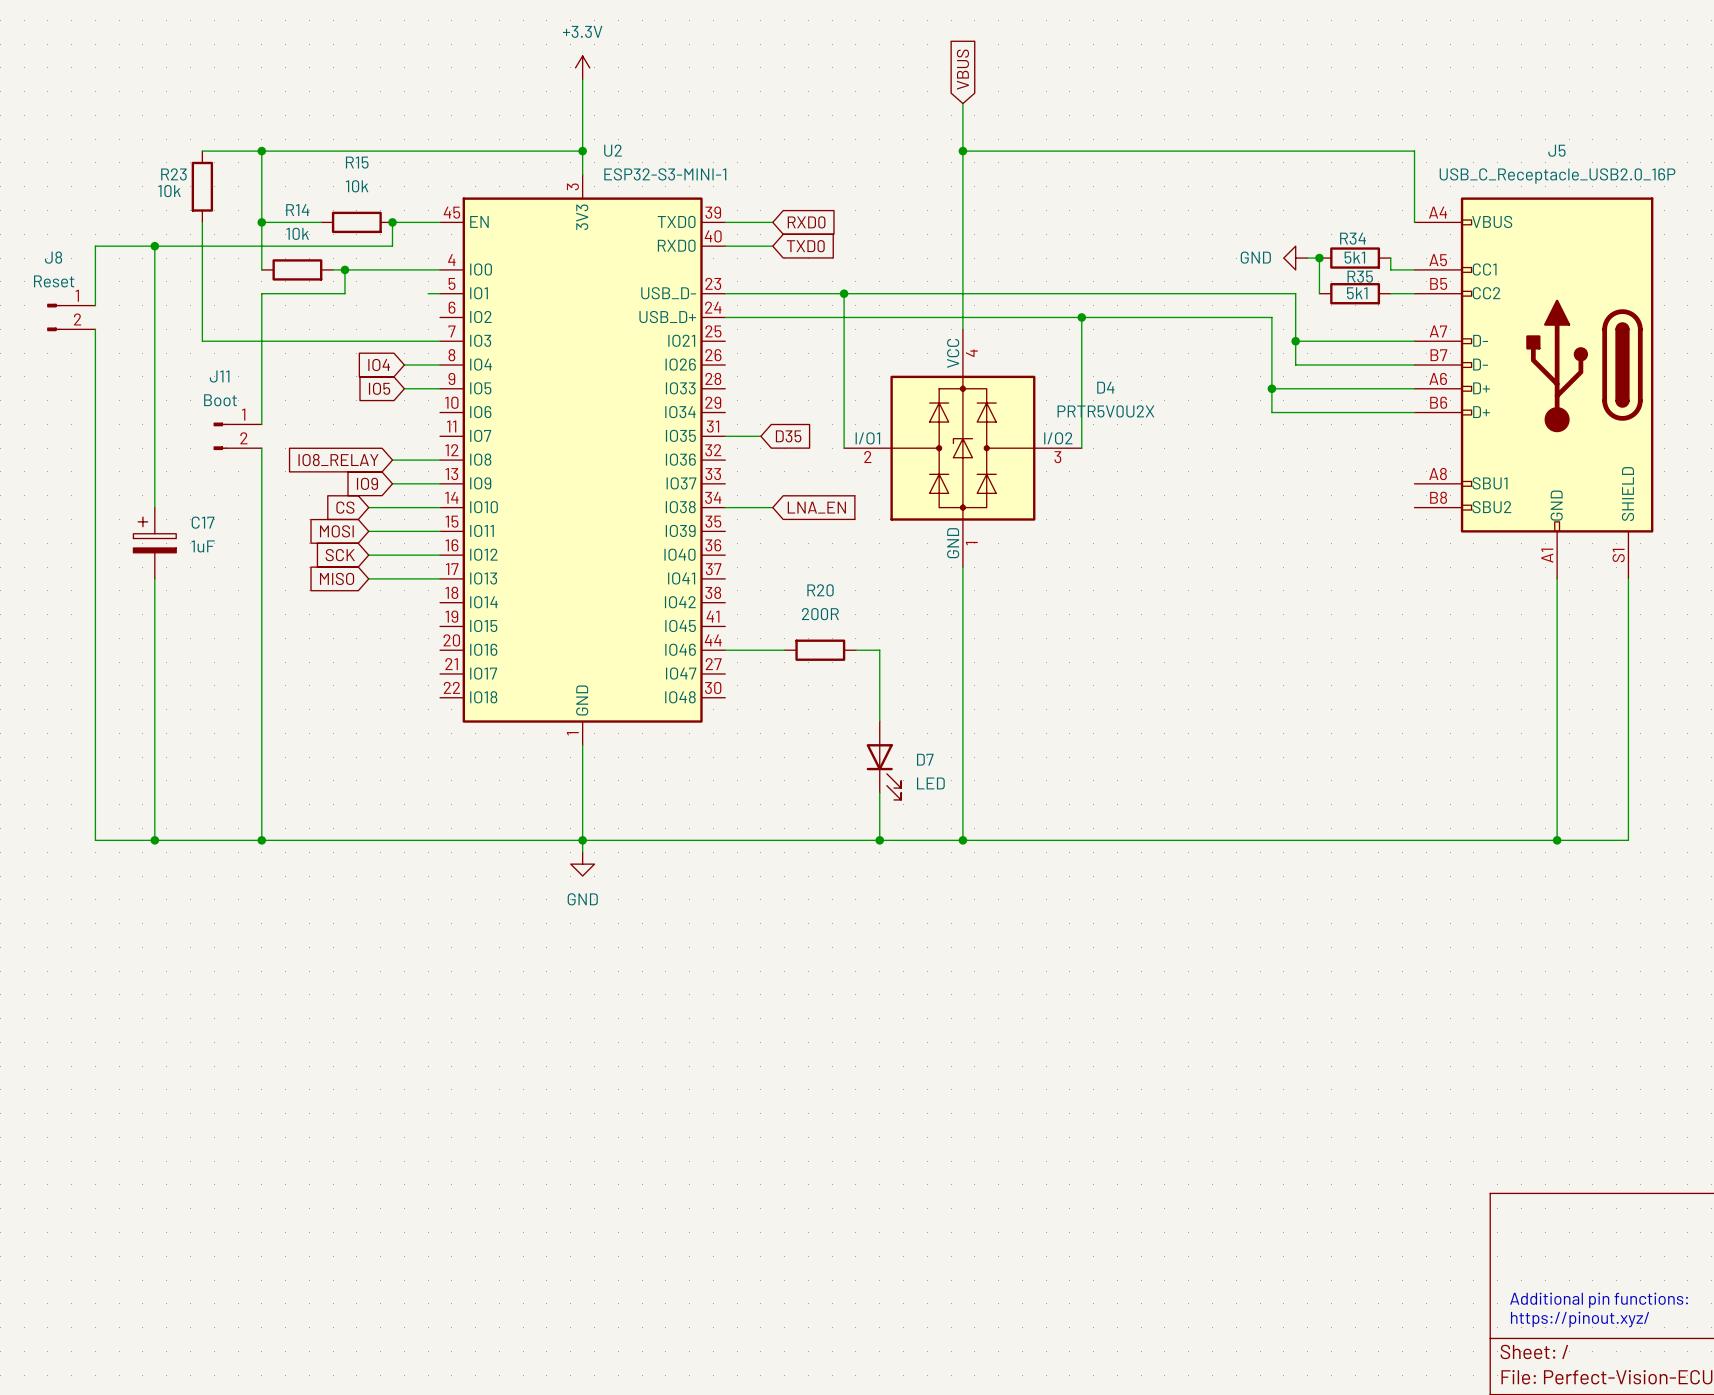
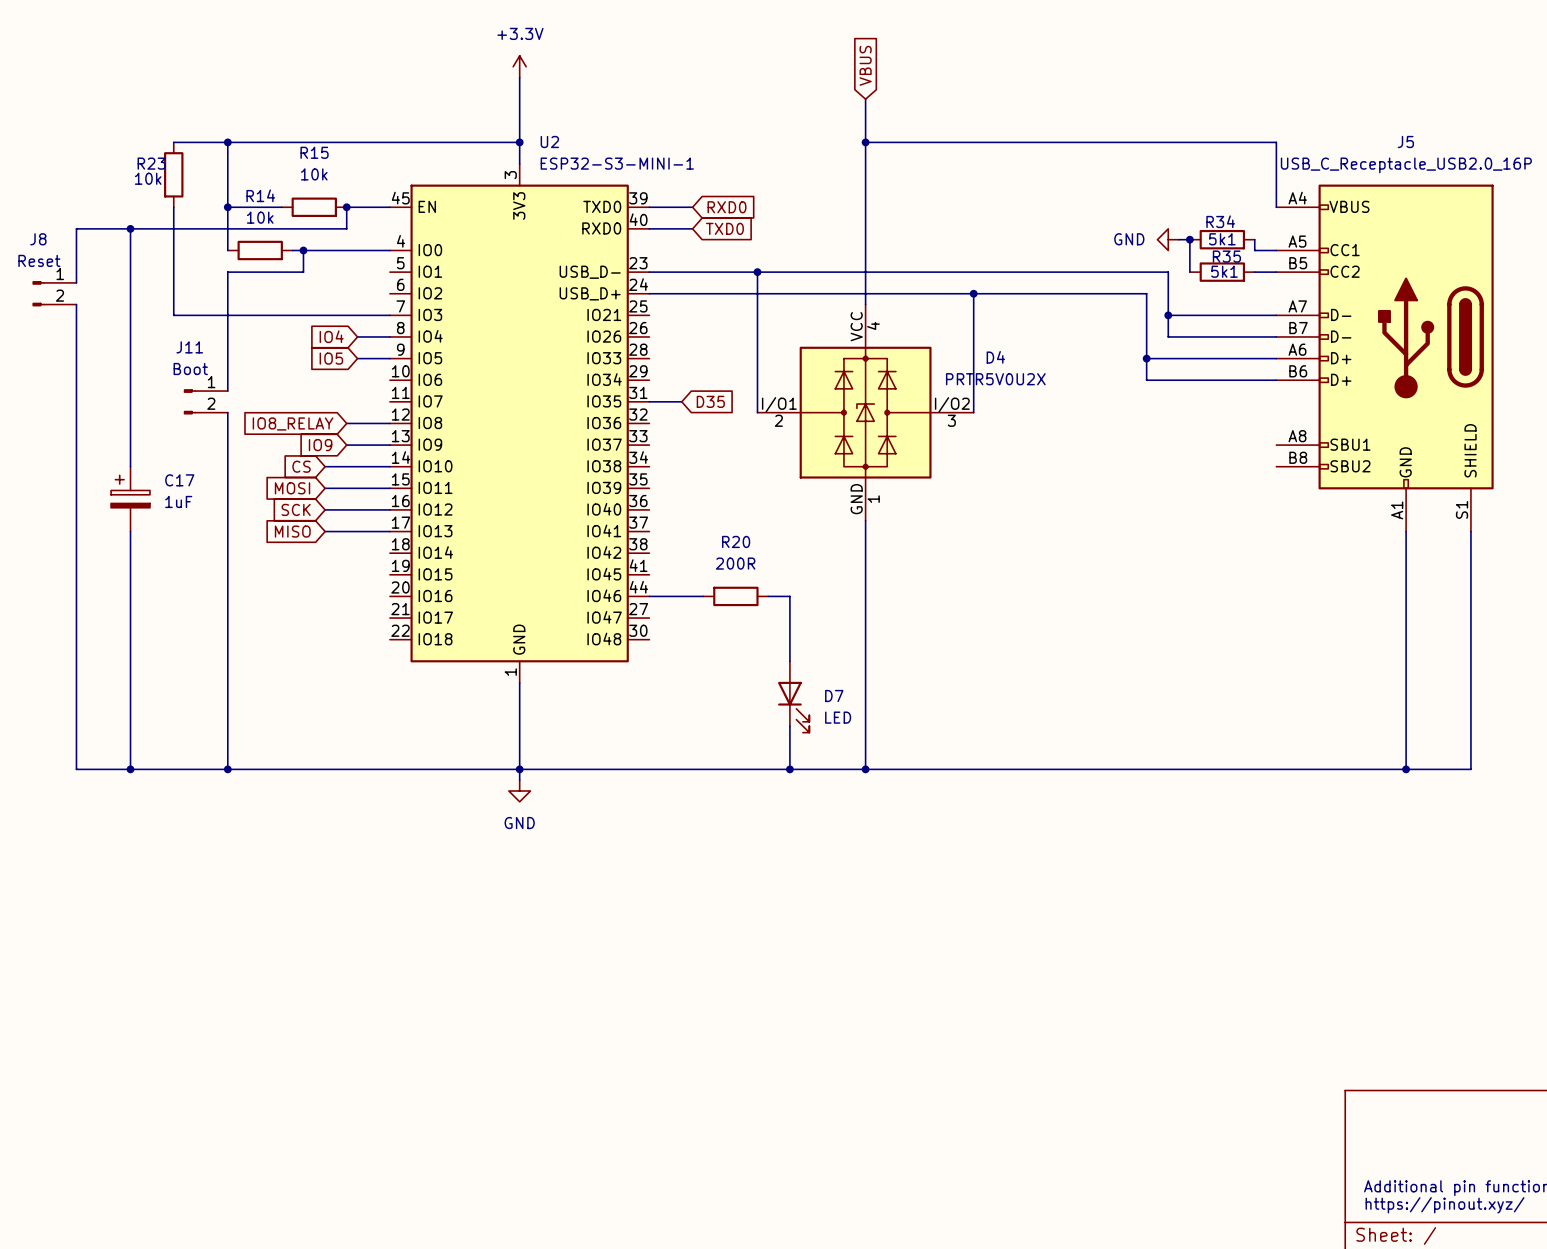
wire: (428, 293) (440, 293) -> none
wire: (725, 507) (772, 507) -> none
global label: LNA_EN (816, 507) -> none

